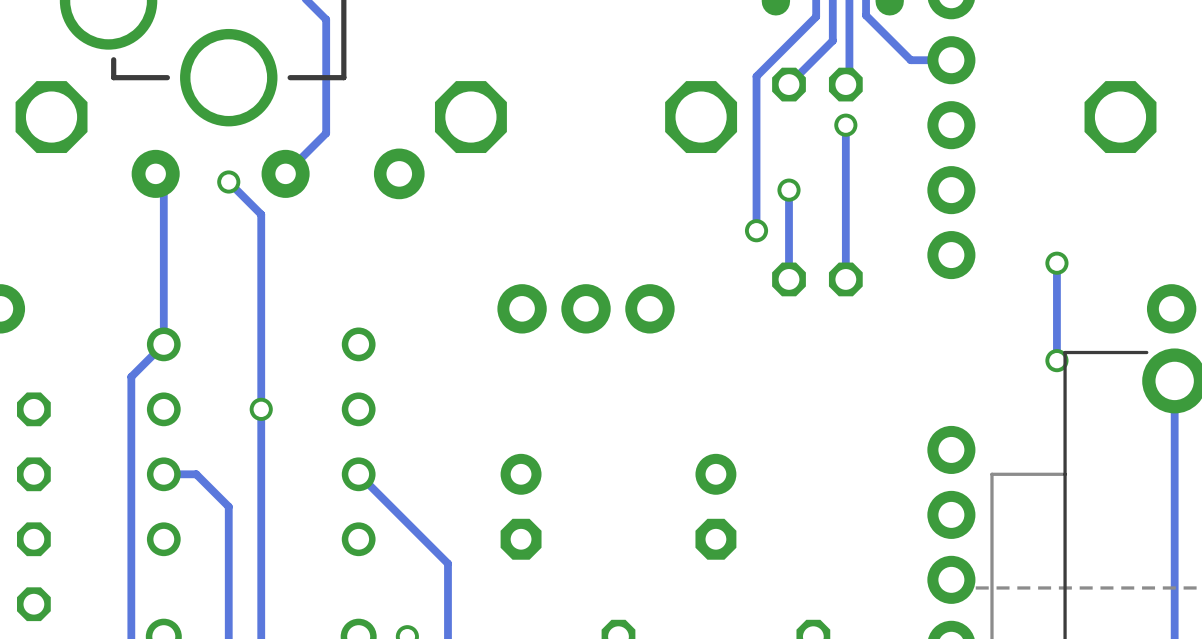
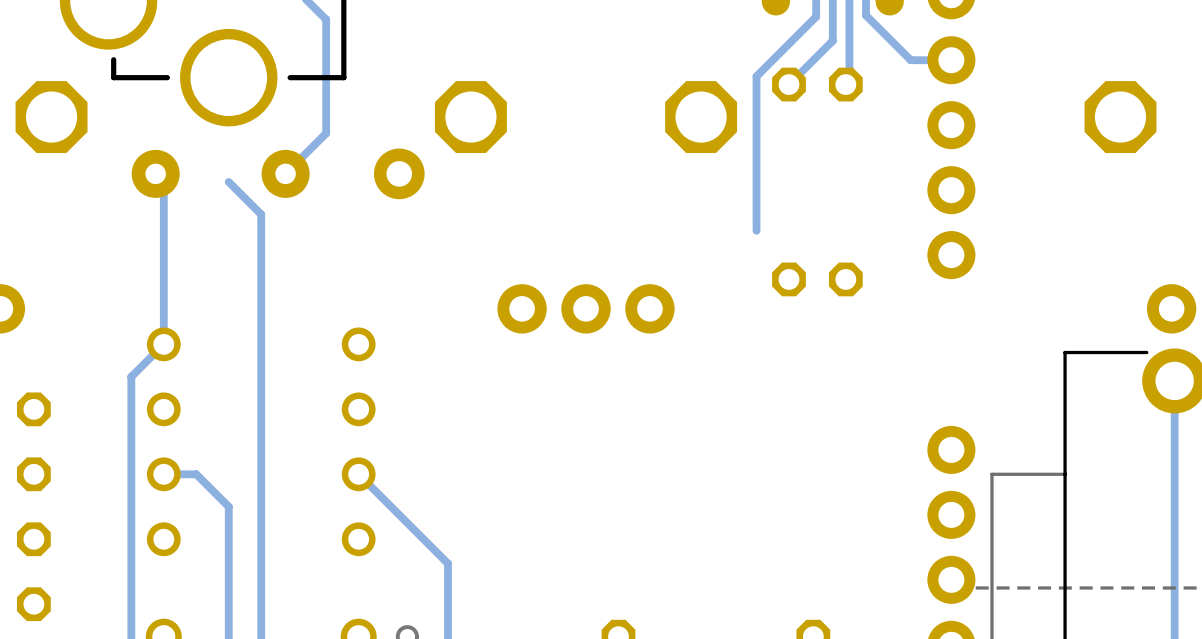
track: (845, 125) (845, 279) -> none
via: (845, 125) -> none
via: (228, 182) -> none
track: (789, 190) (789, 279) -> none
via: (789, 190) -> none
via: (756, 230) -> none
track: (1056, 263) (1056, 360) -> none
via: (1056, 263) -> none
via: (1056, 360) -> none
via: (261, 409) -> none
part: (521, 506) -> none
part: (715, 506) -> none

